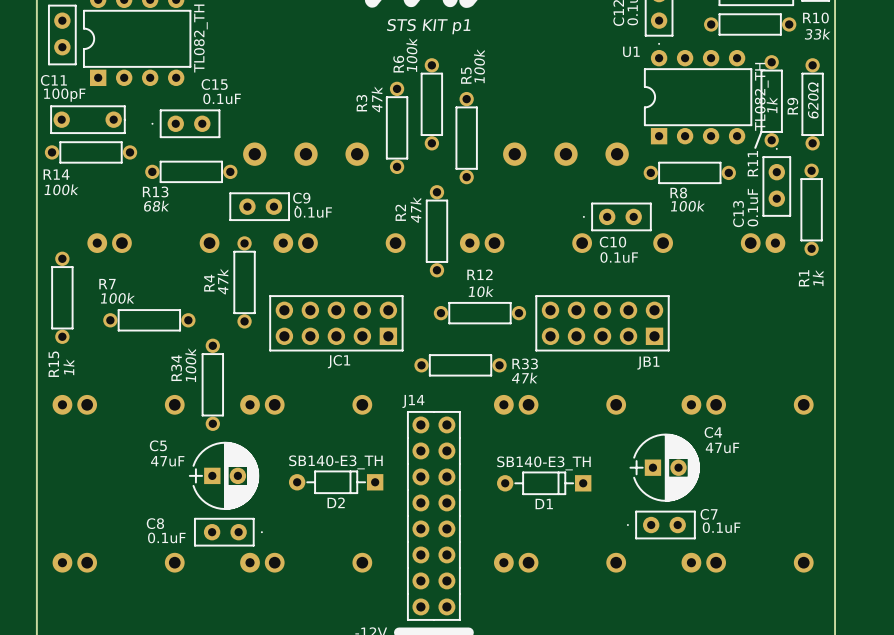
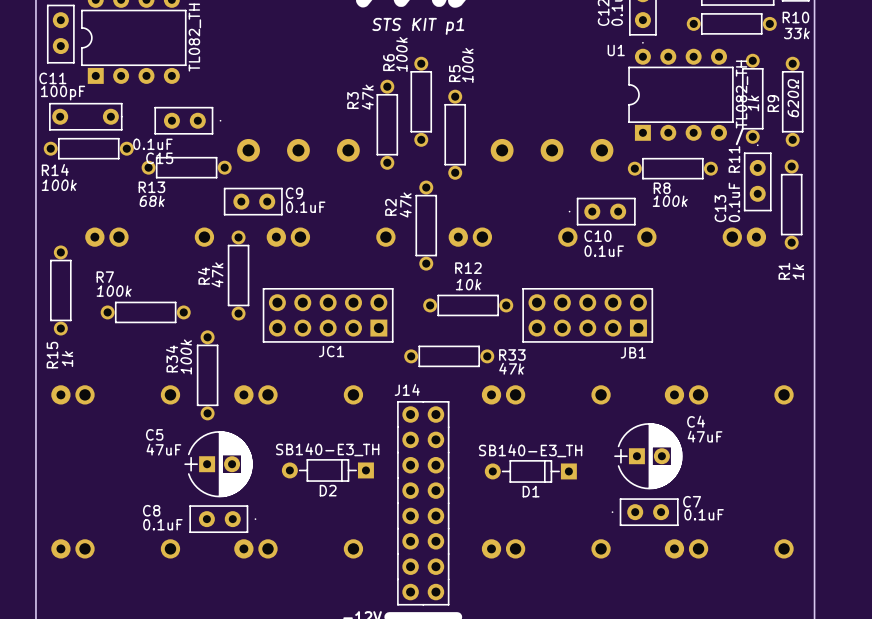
C15 rotation: 0° (186, 123) -> 180° (187, 120)

